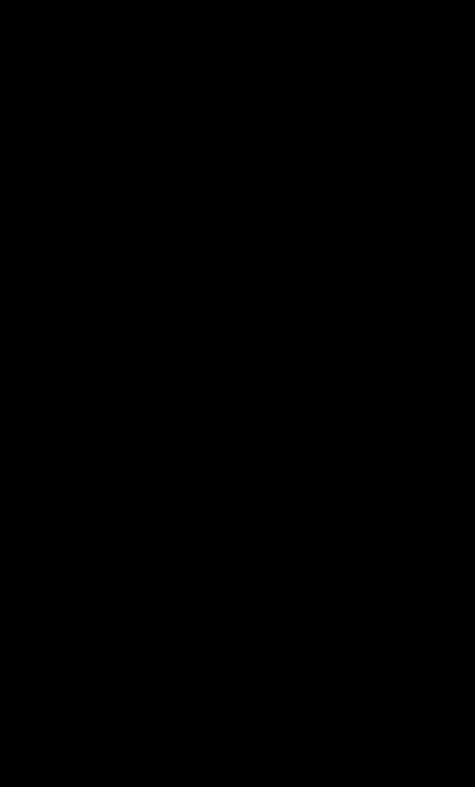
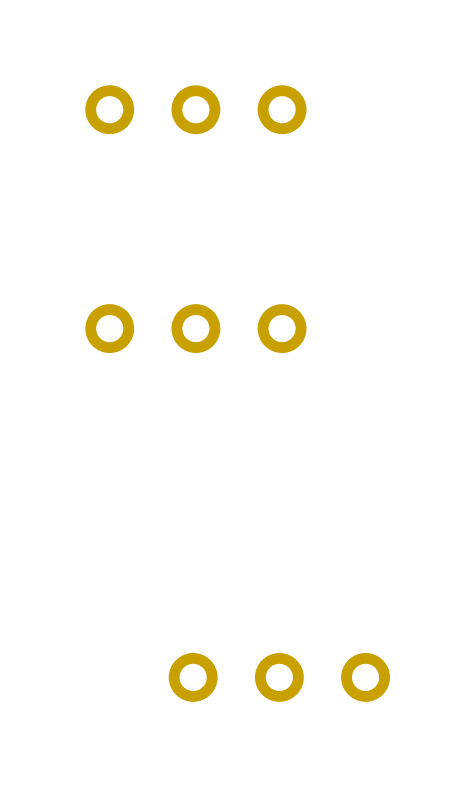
part: none -> (195, 109)
part: none -> (195, 328)
part: none -> (279, 677)

